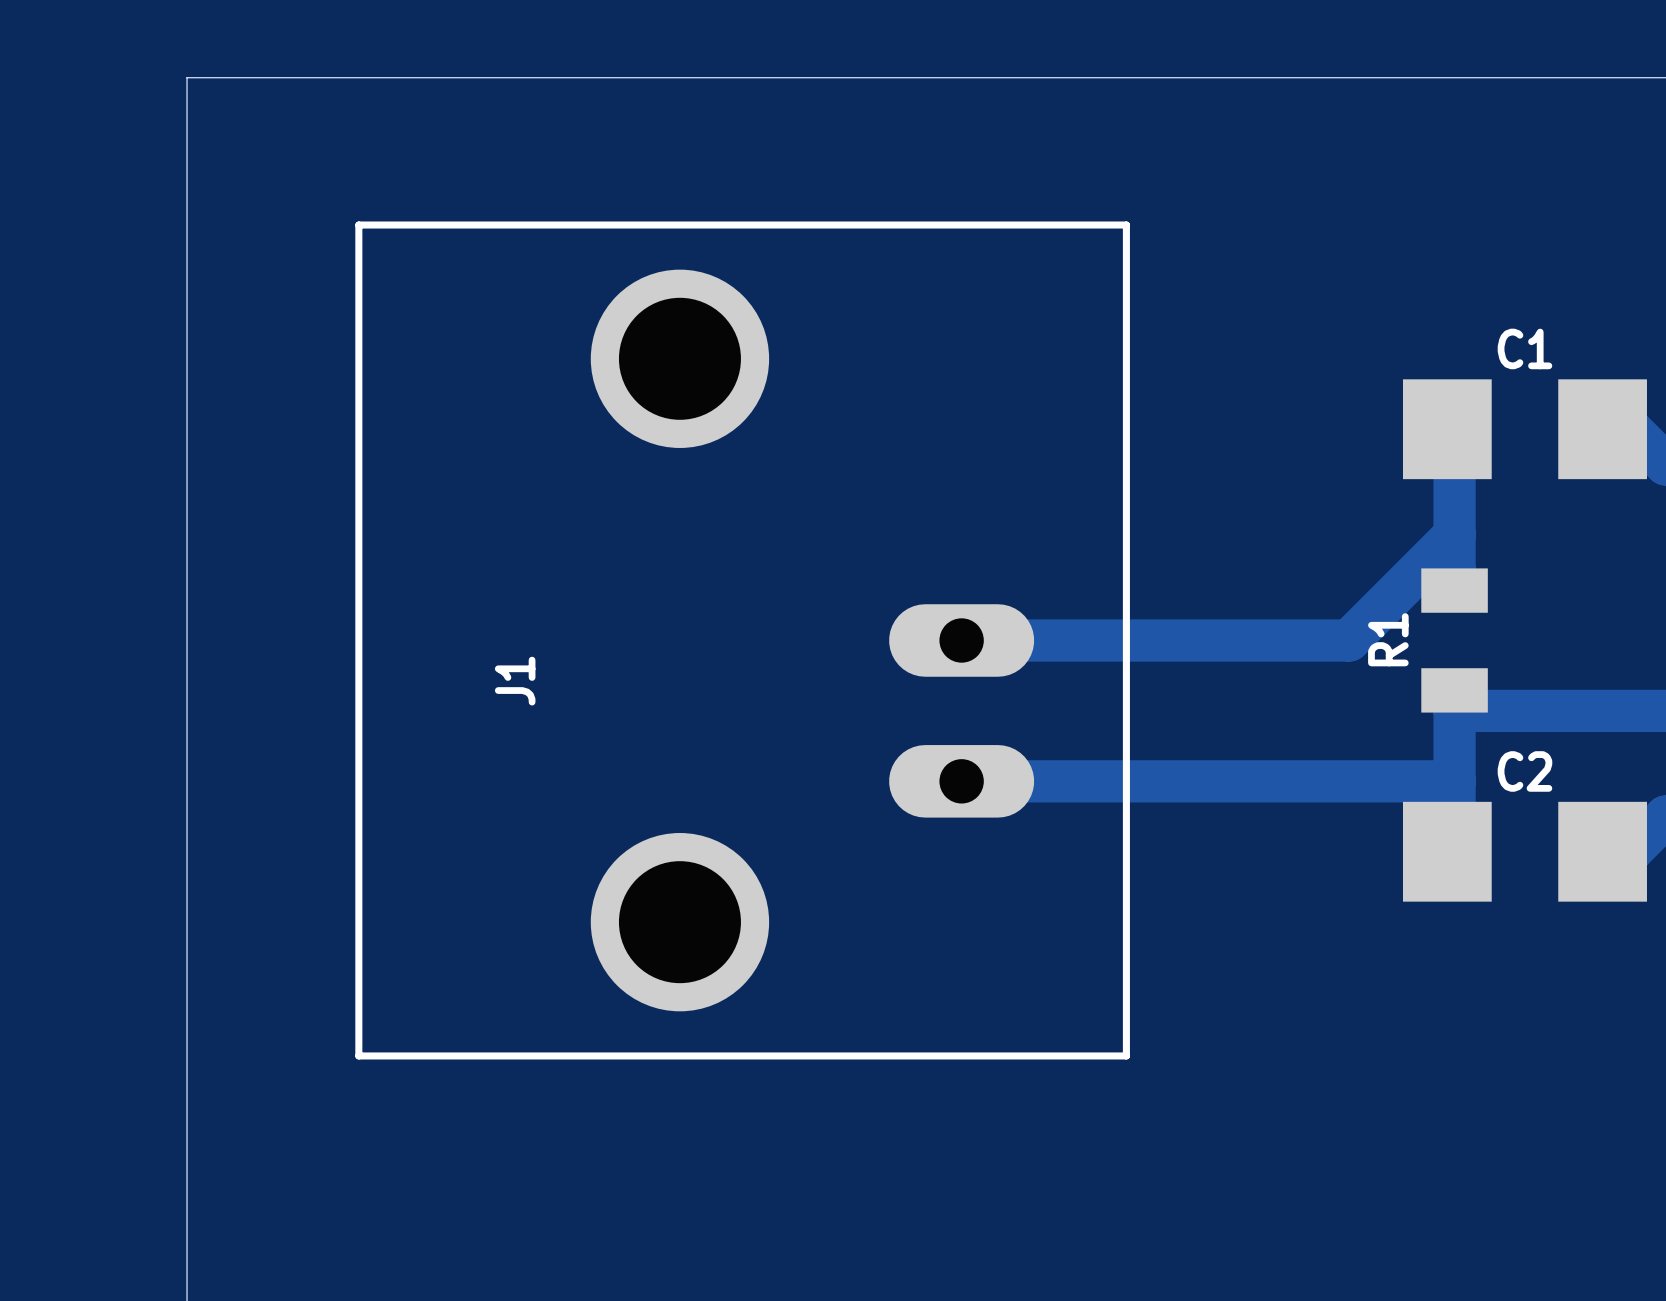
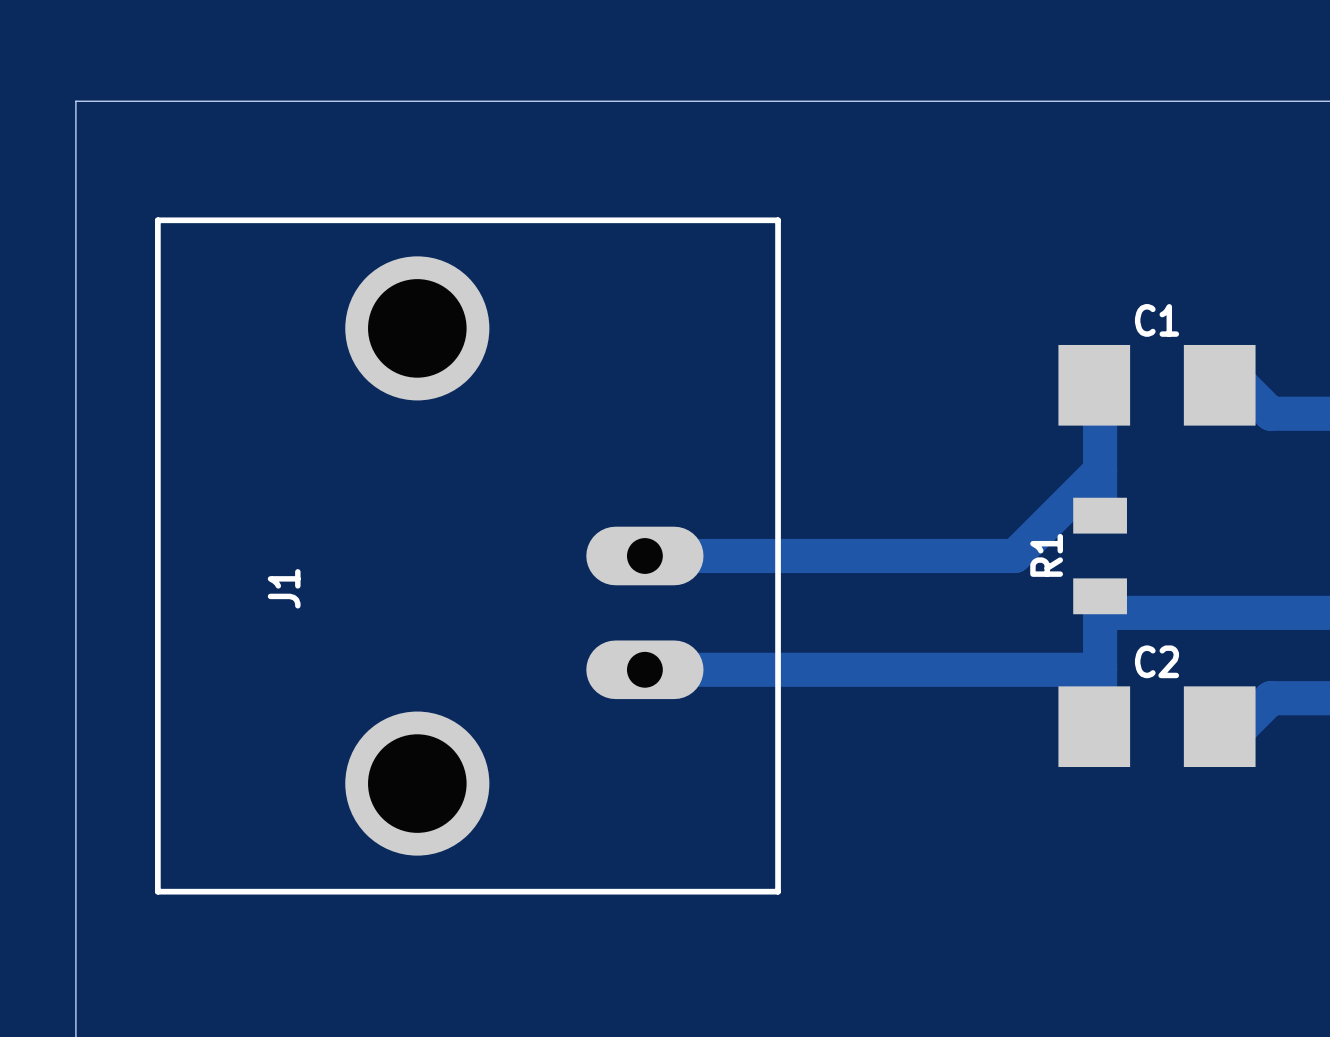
J1 position: (742, 640) -> (467, 555)

